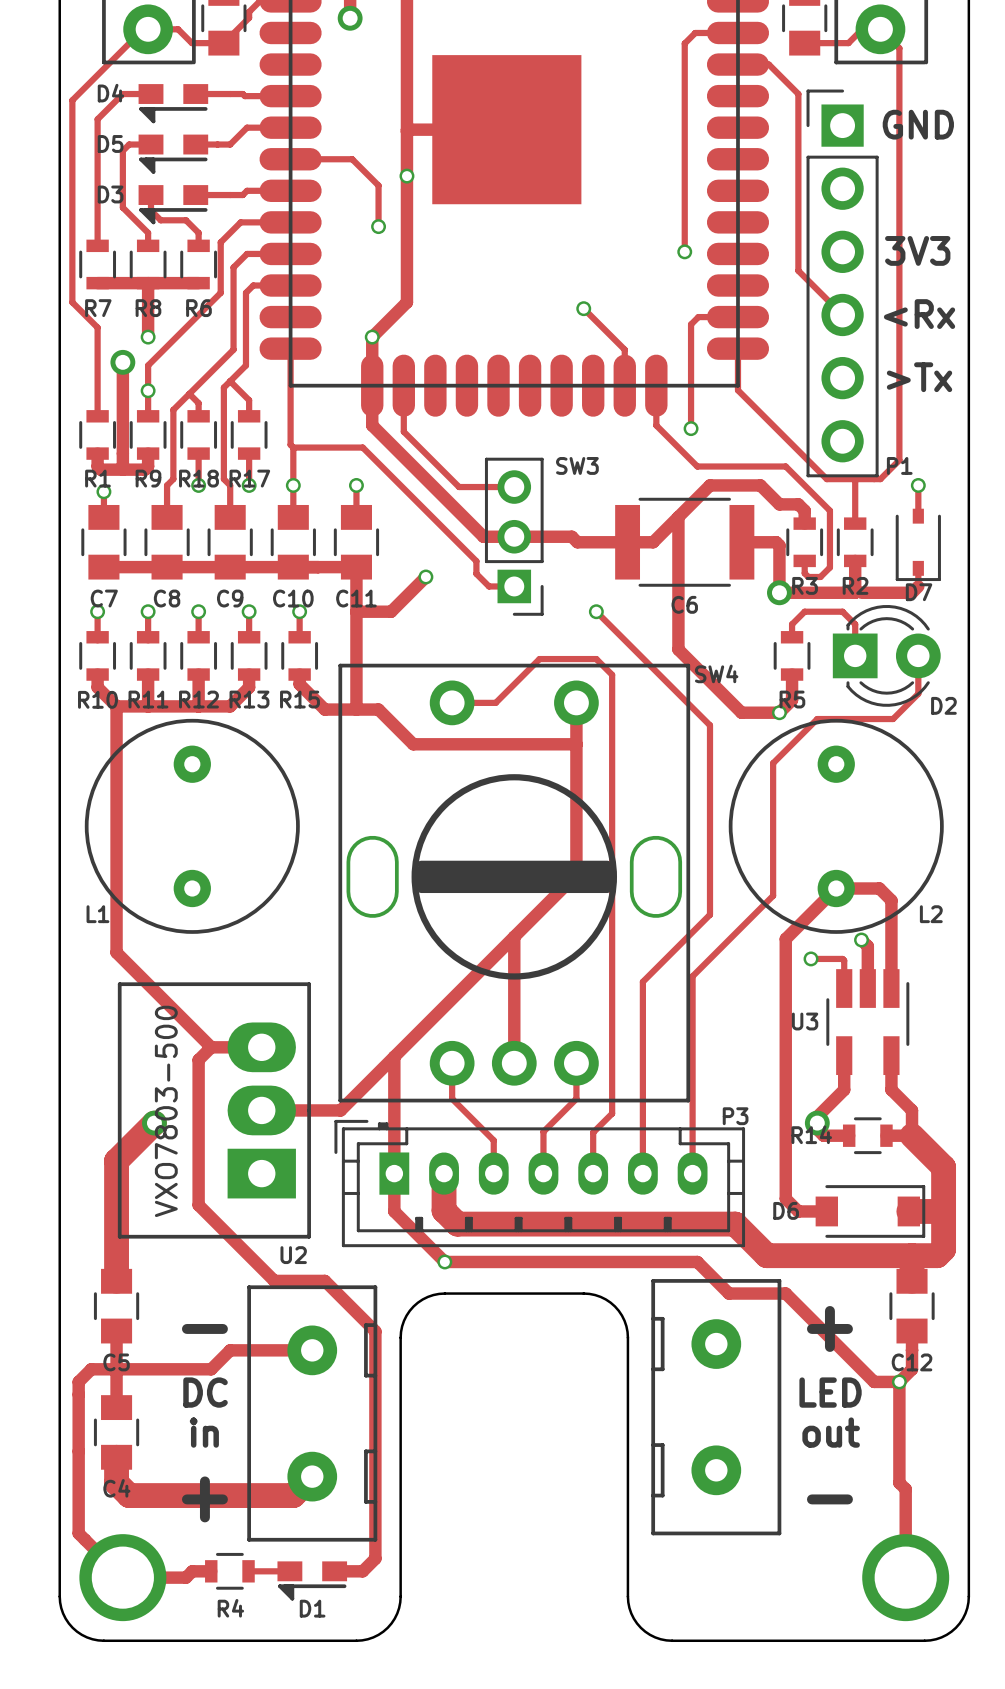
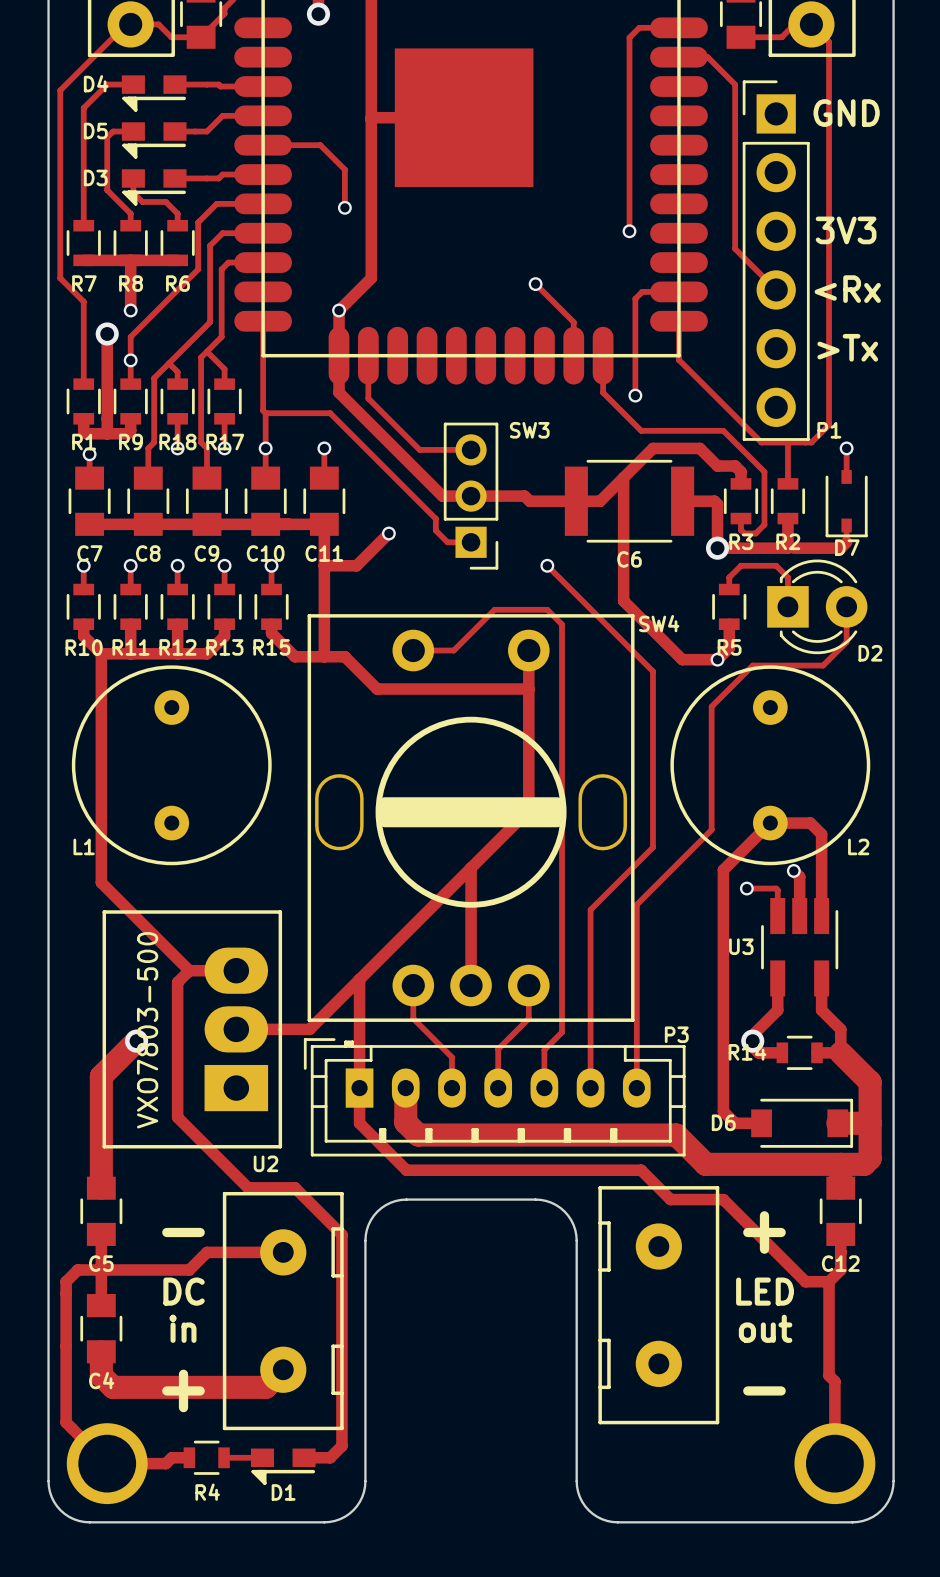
via: (406, 176) -> none
via: (444, 1261) -> none
via: (899, 1381) -> none

